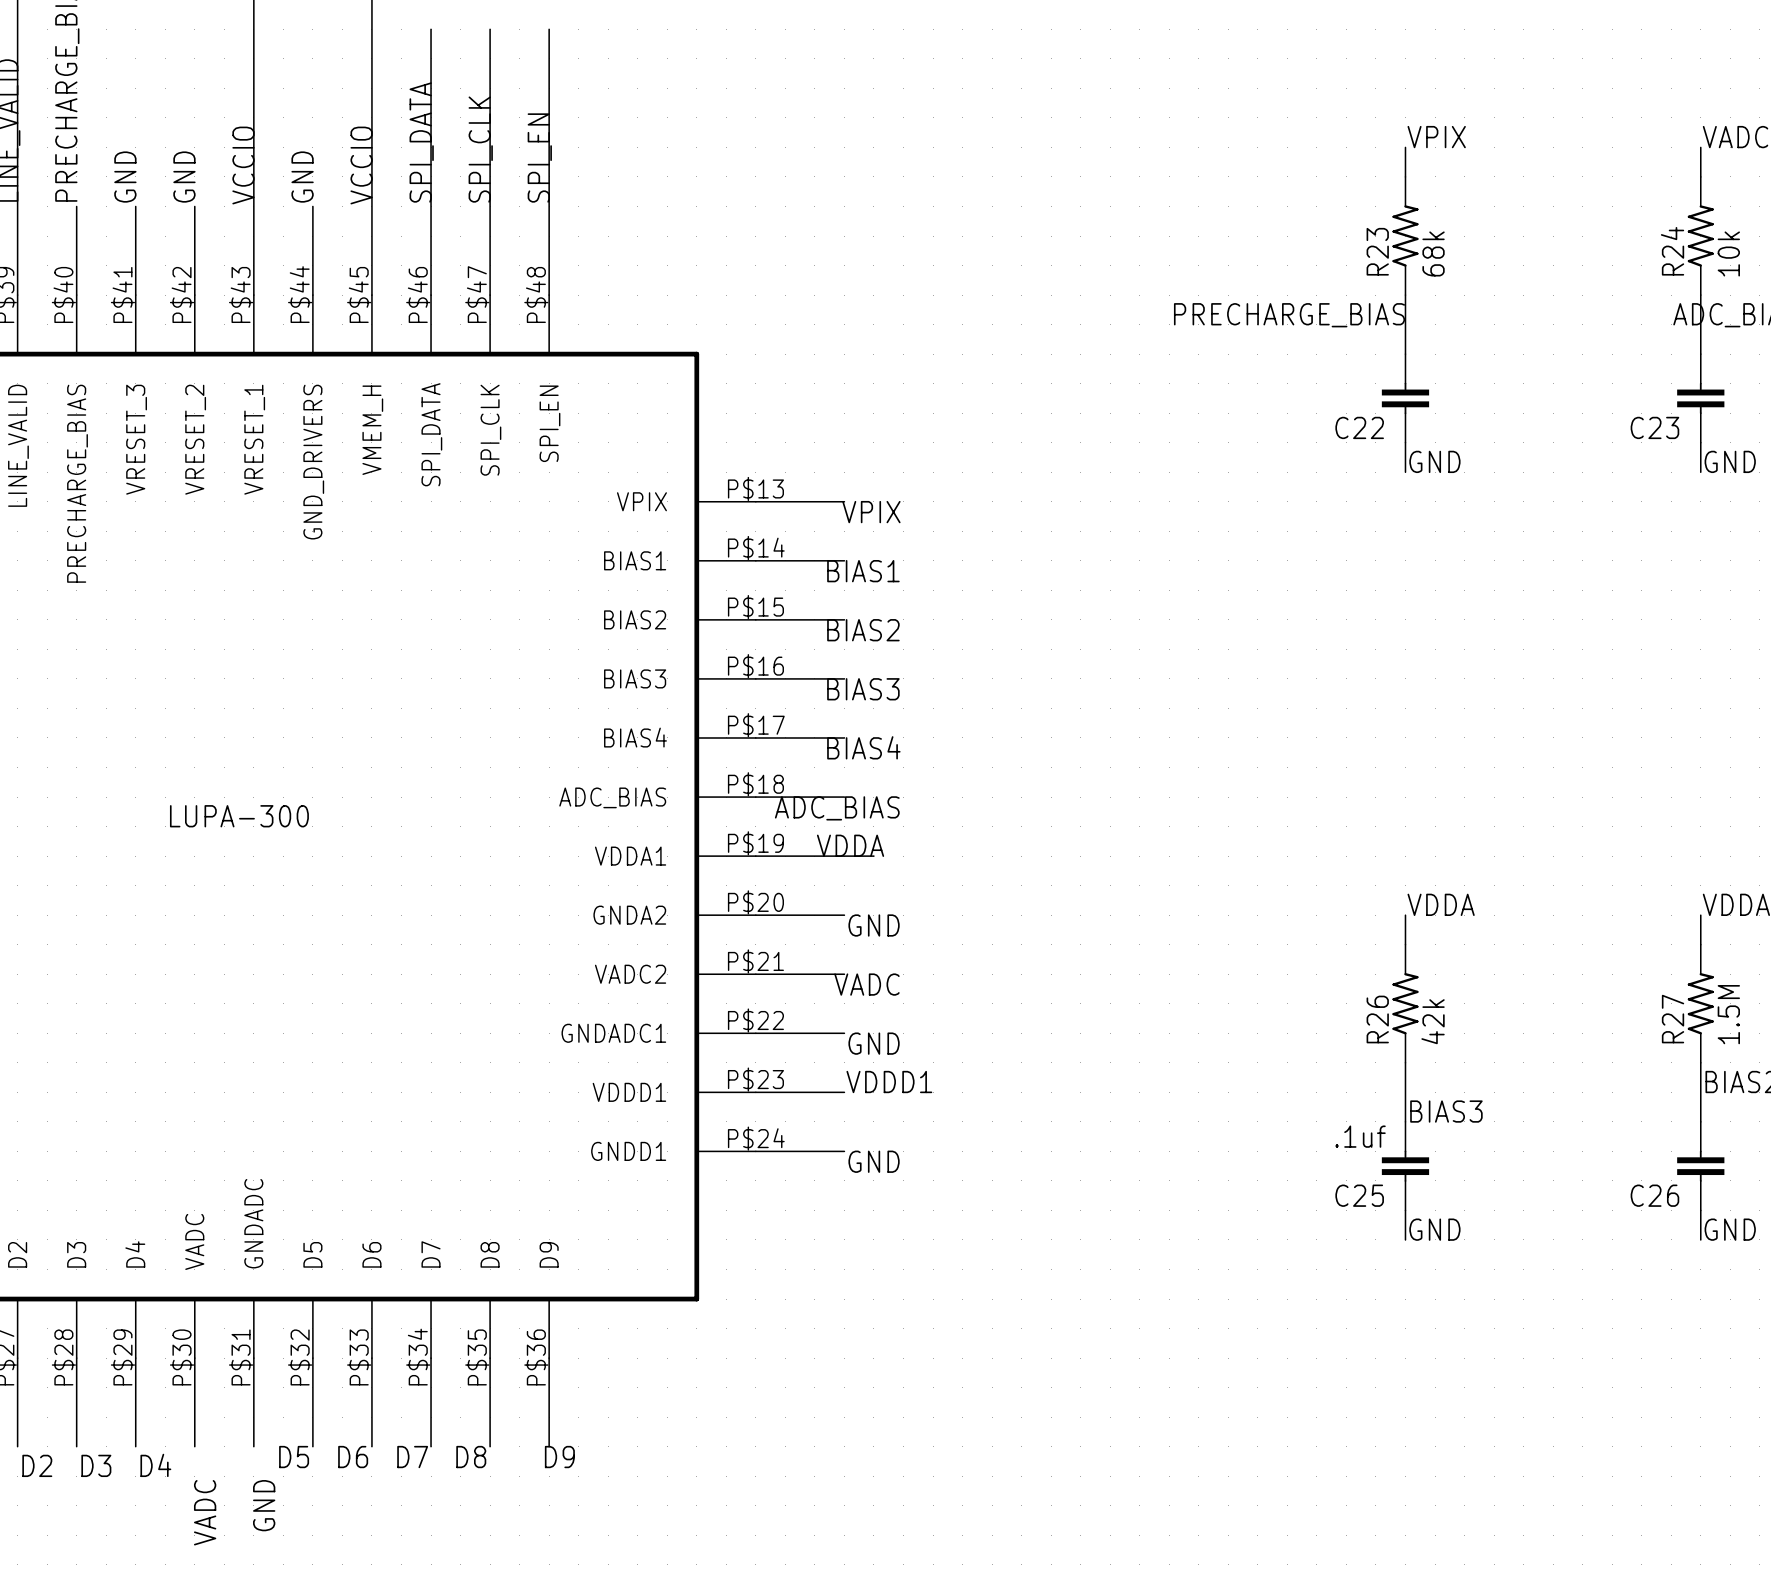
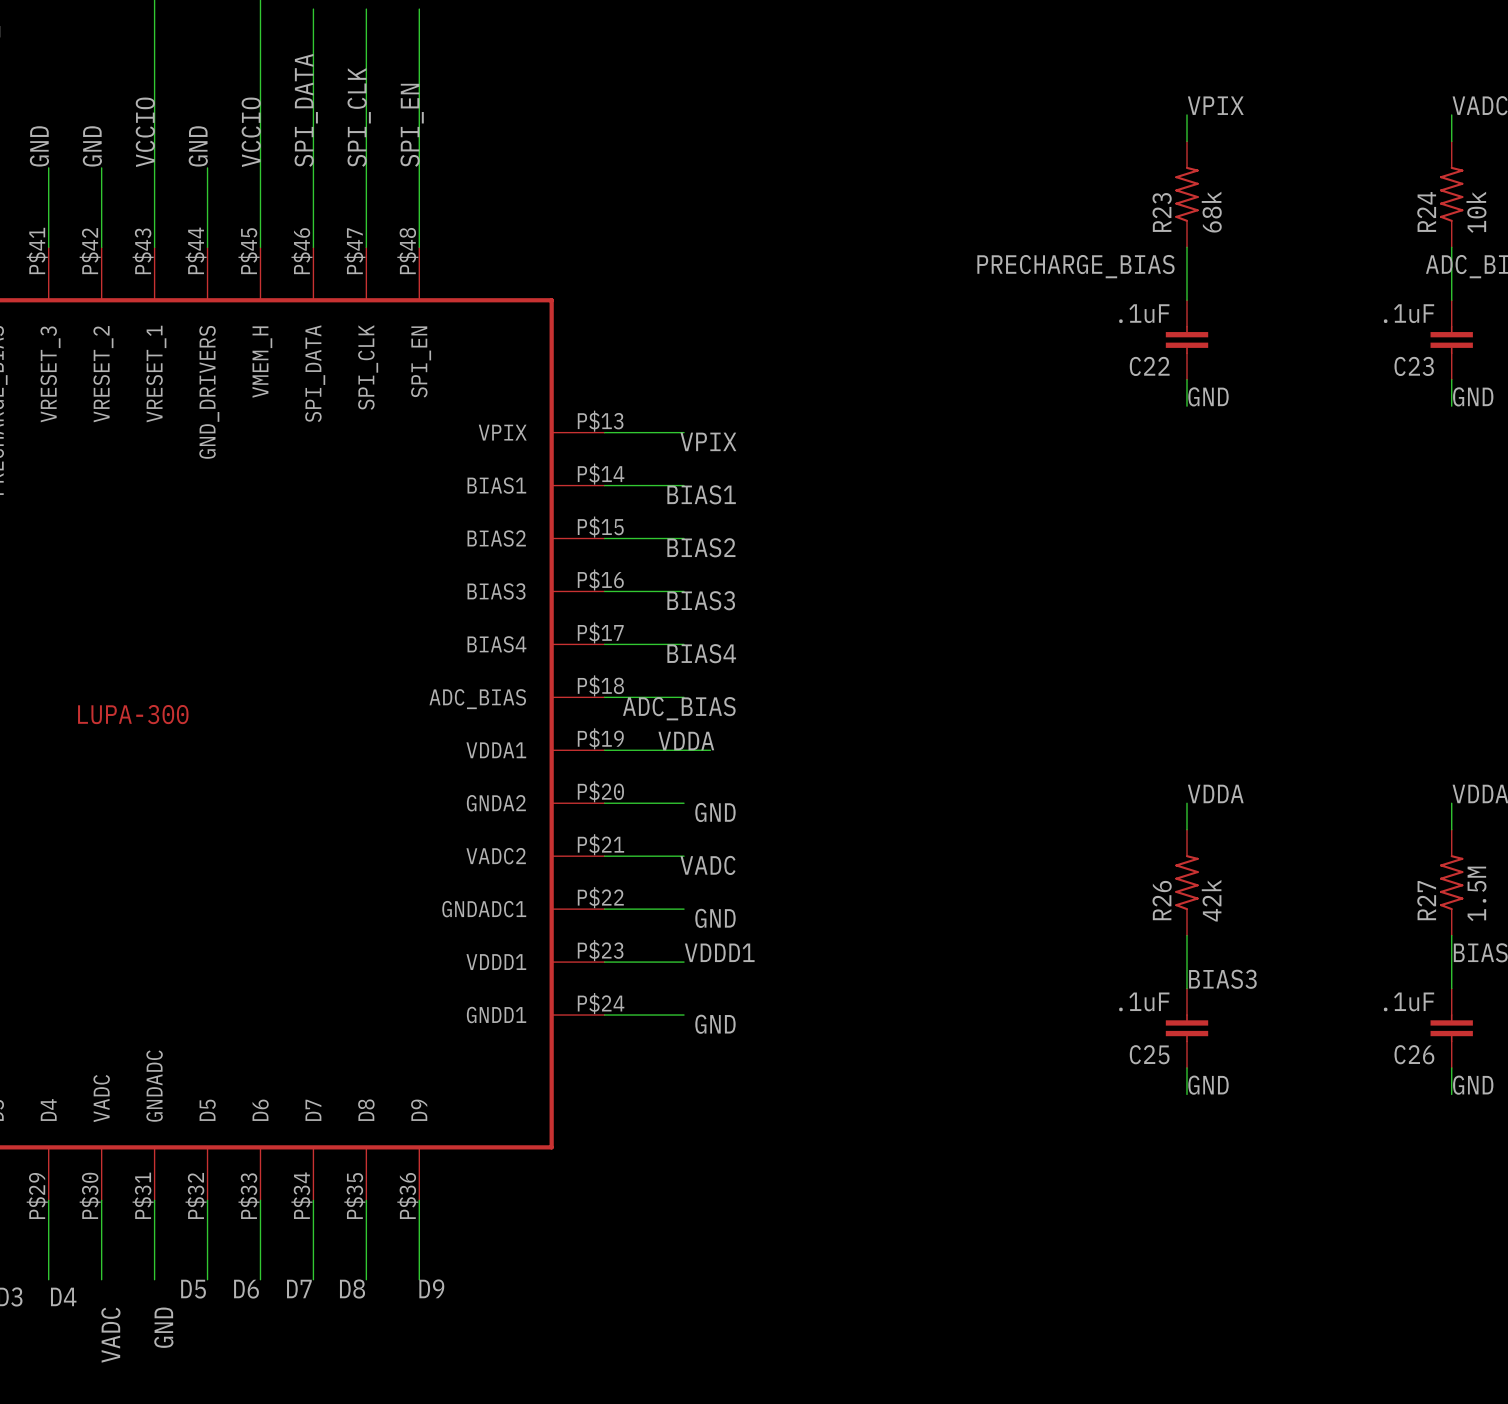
C22 value: none -> .1uF (1144, 313)
C23 value: none -> .1uF (1409, 313)
C25 value: .1uf (1360, 1136) -> .1uF (1144, 1001)
C26 value: none -> .1uF (1409, 1001)

